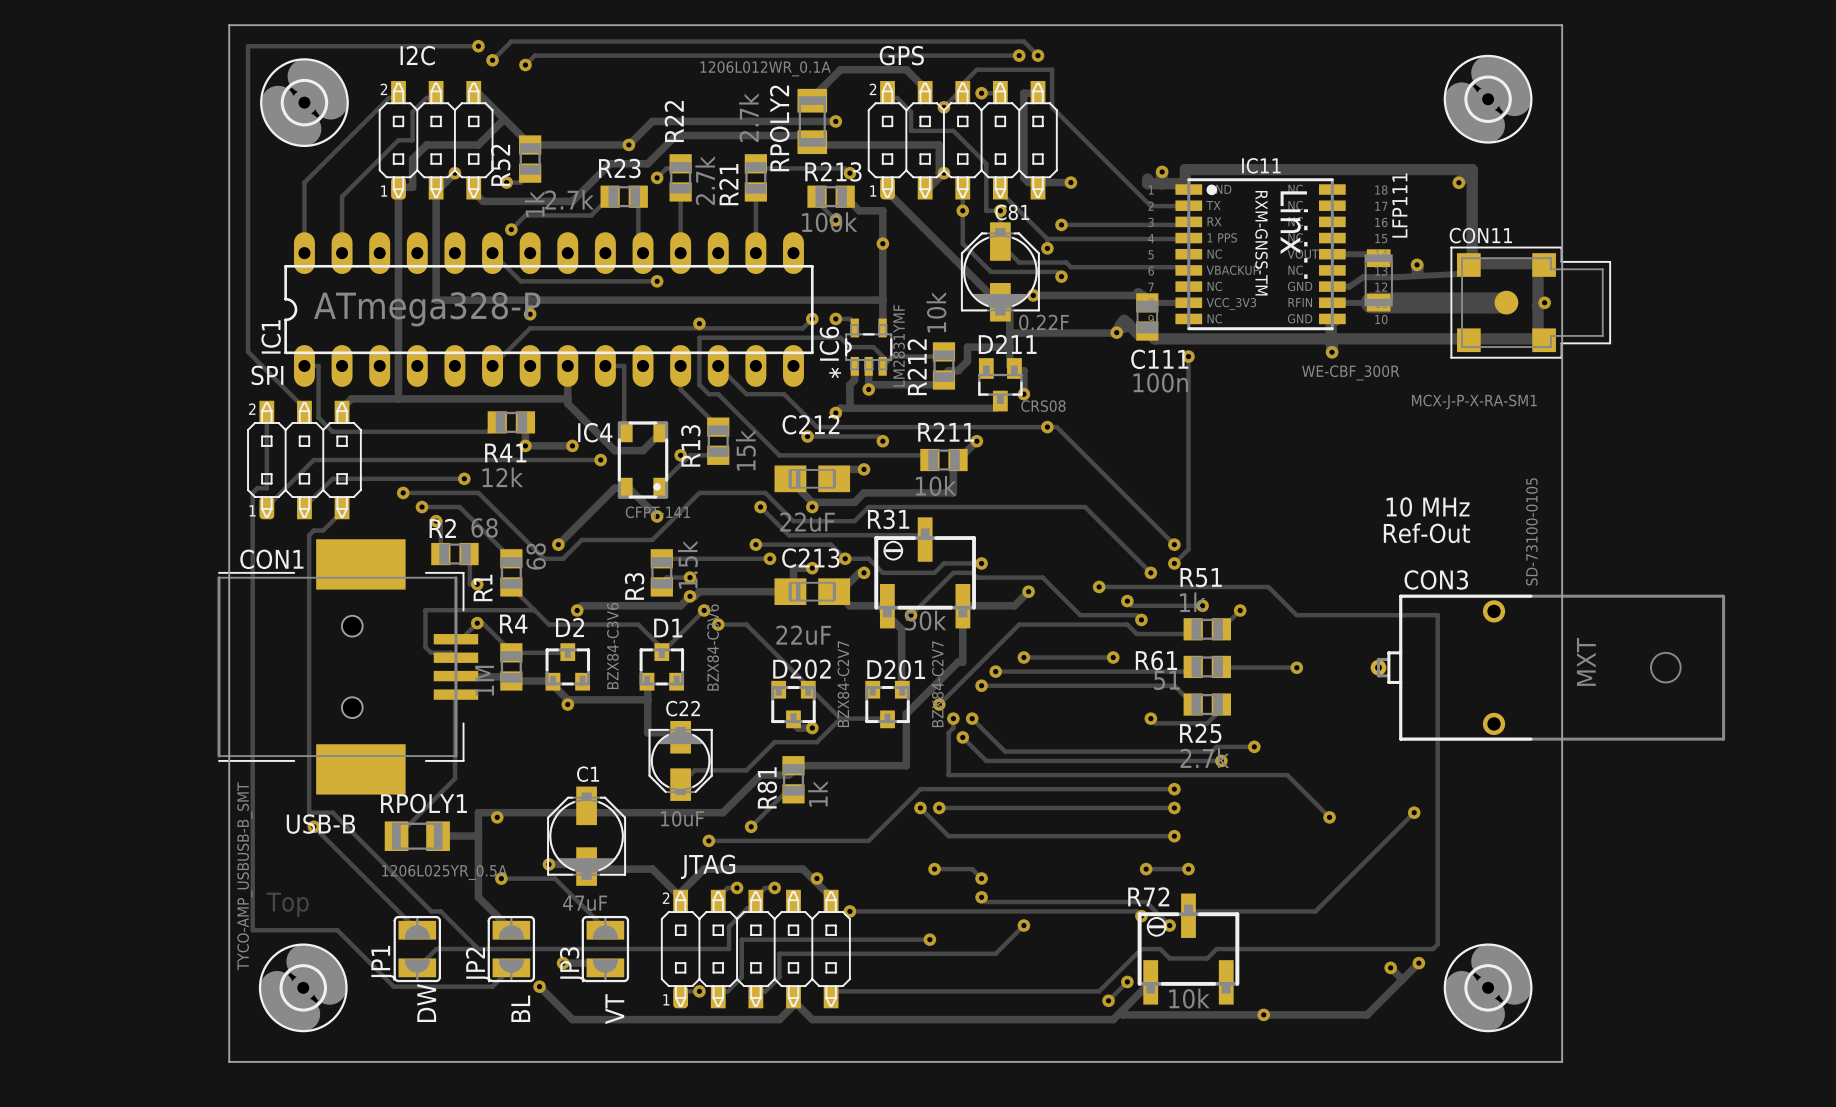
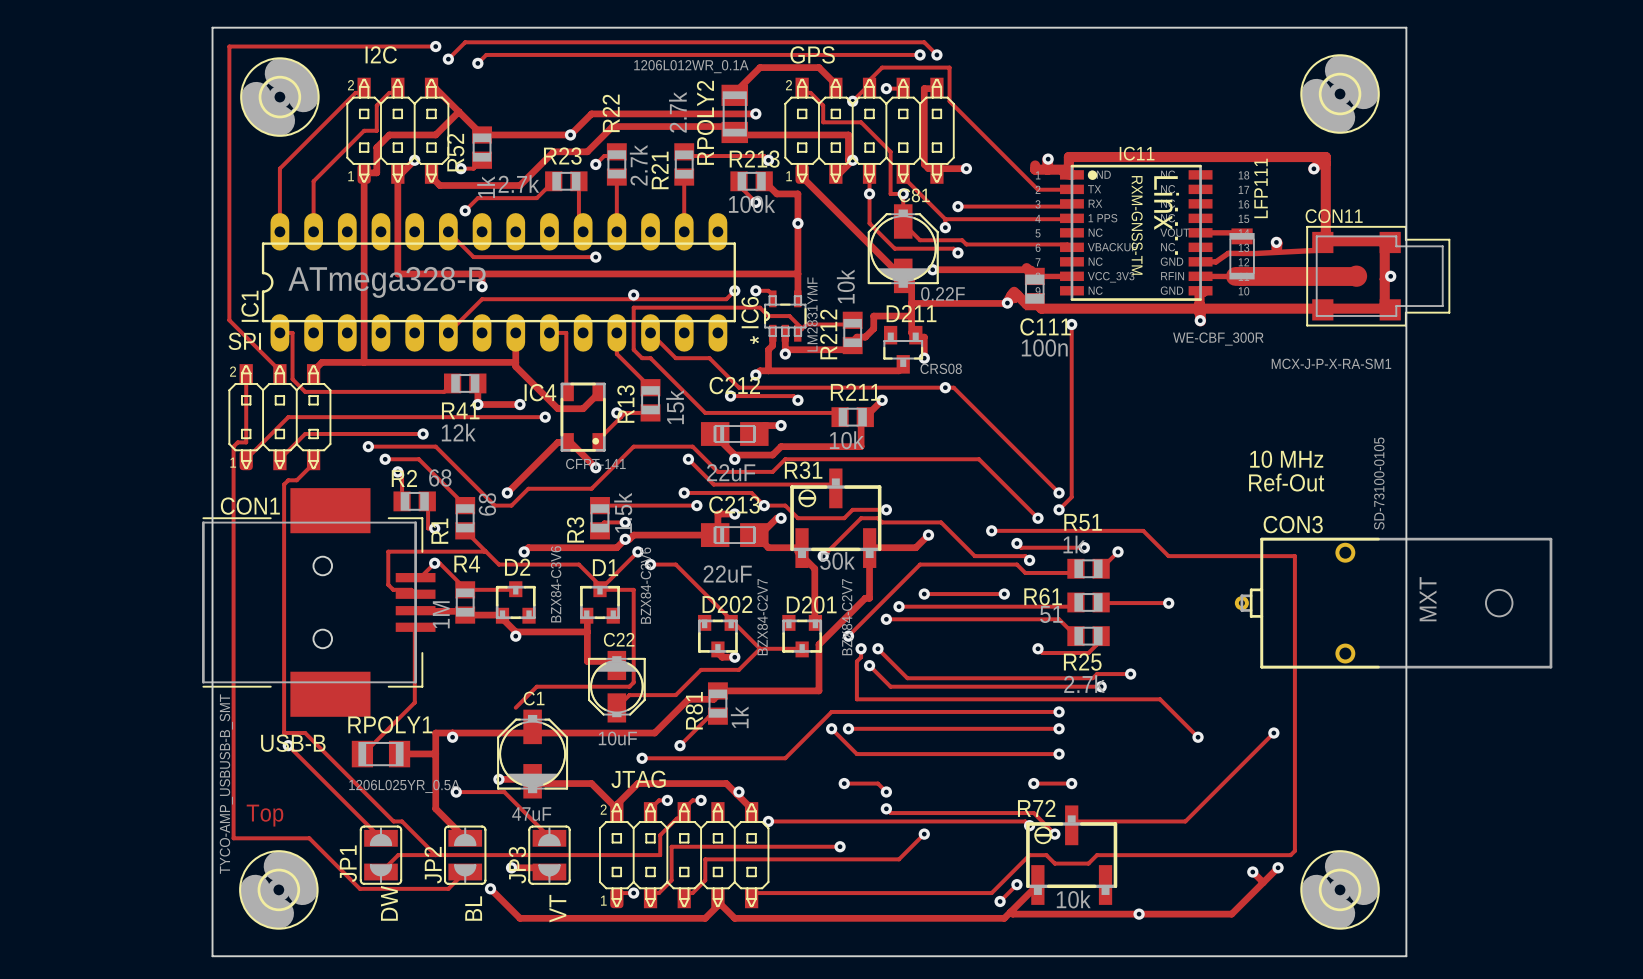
track: none -> (599, 589) (633, 589) (633, 682) (629, 686) (536, 686) (515, 707)

